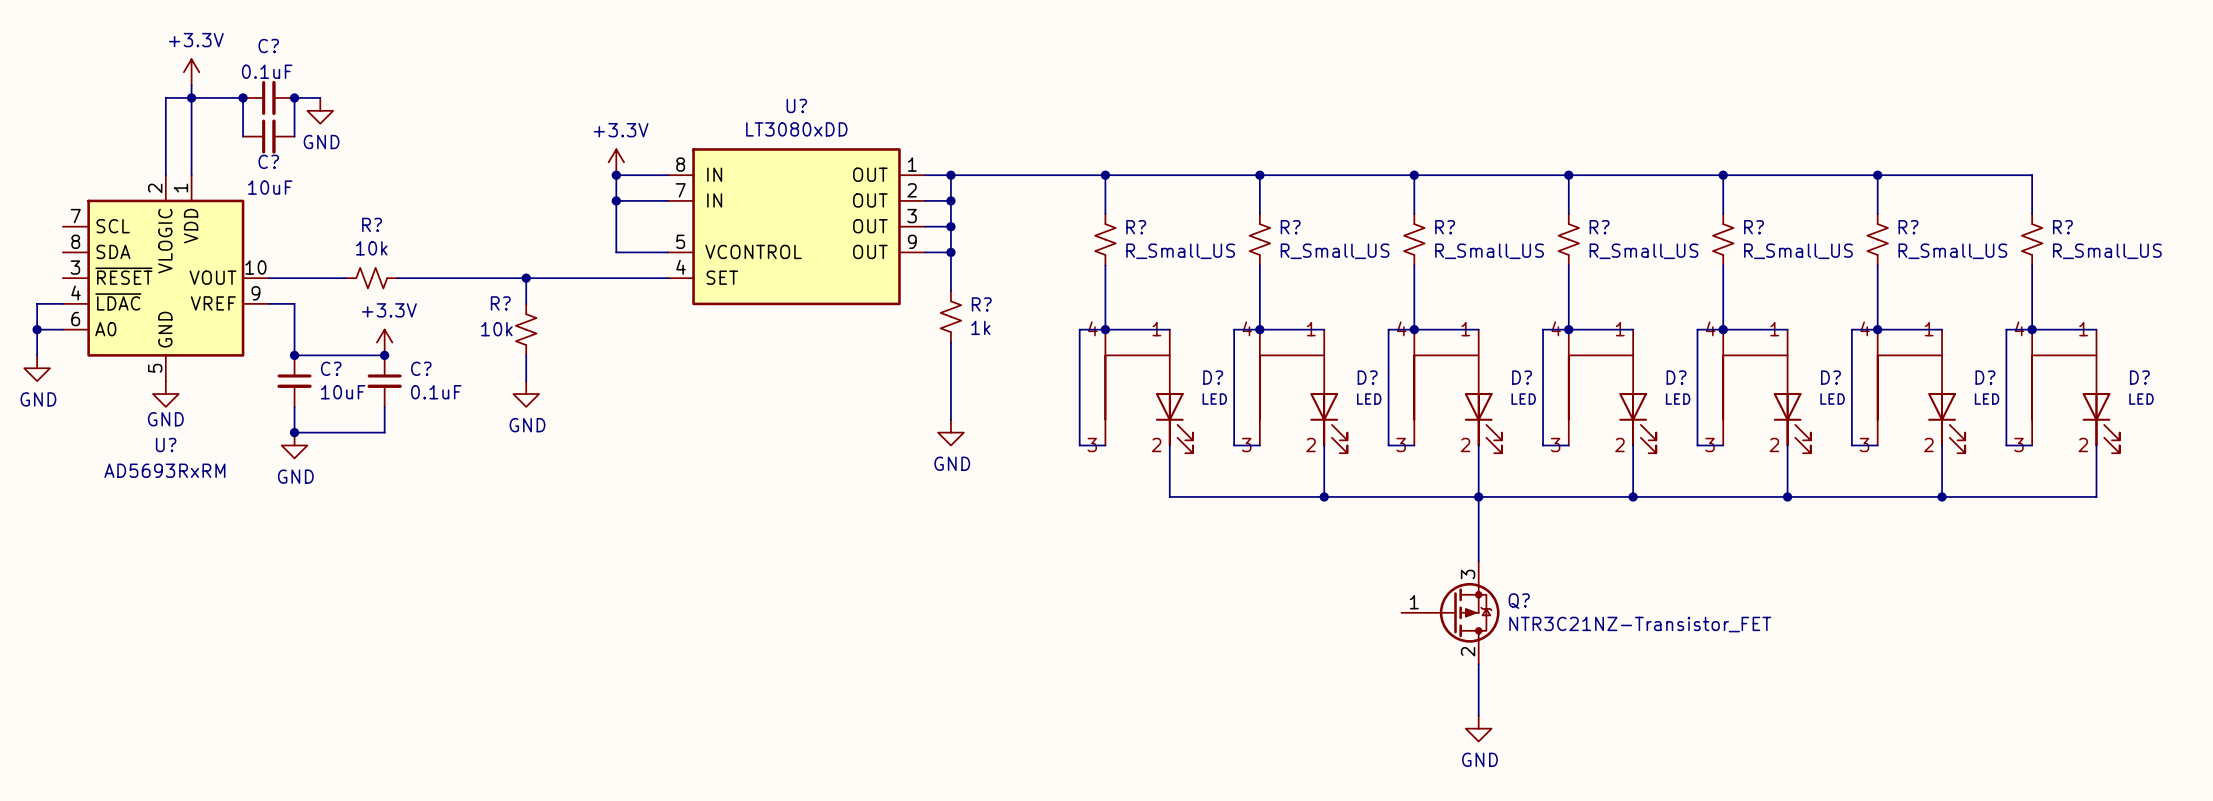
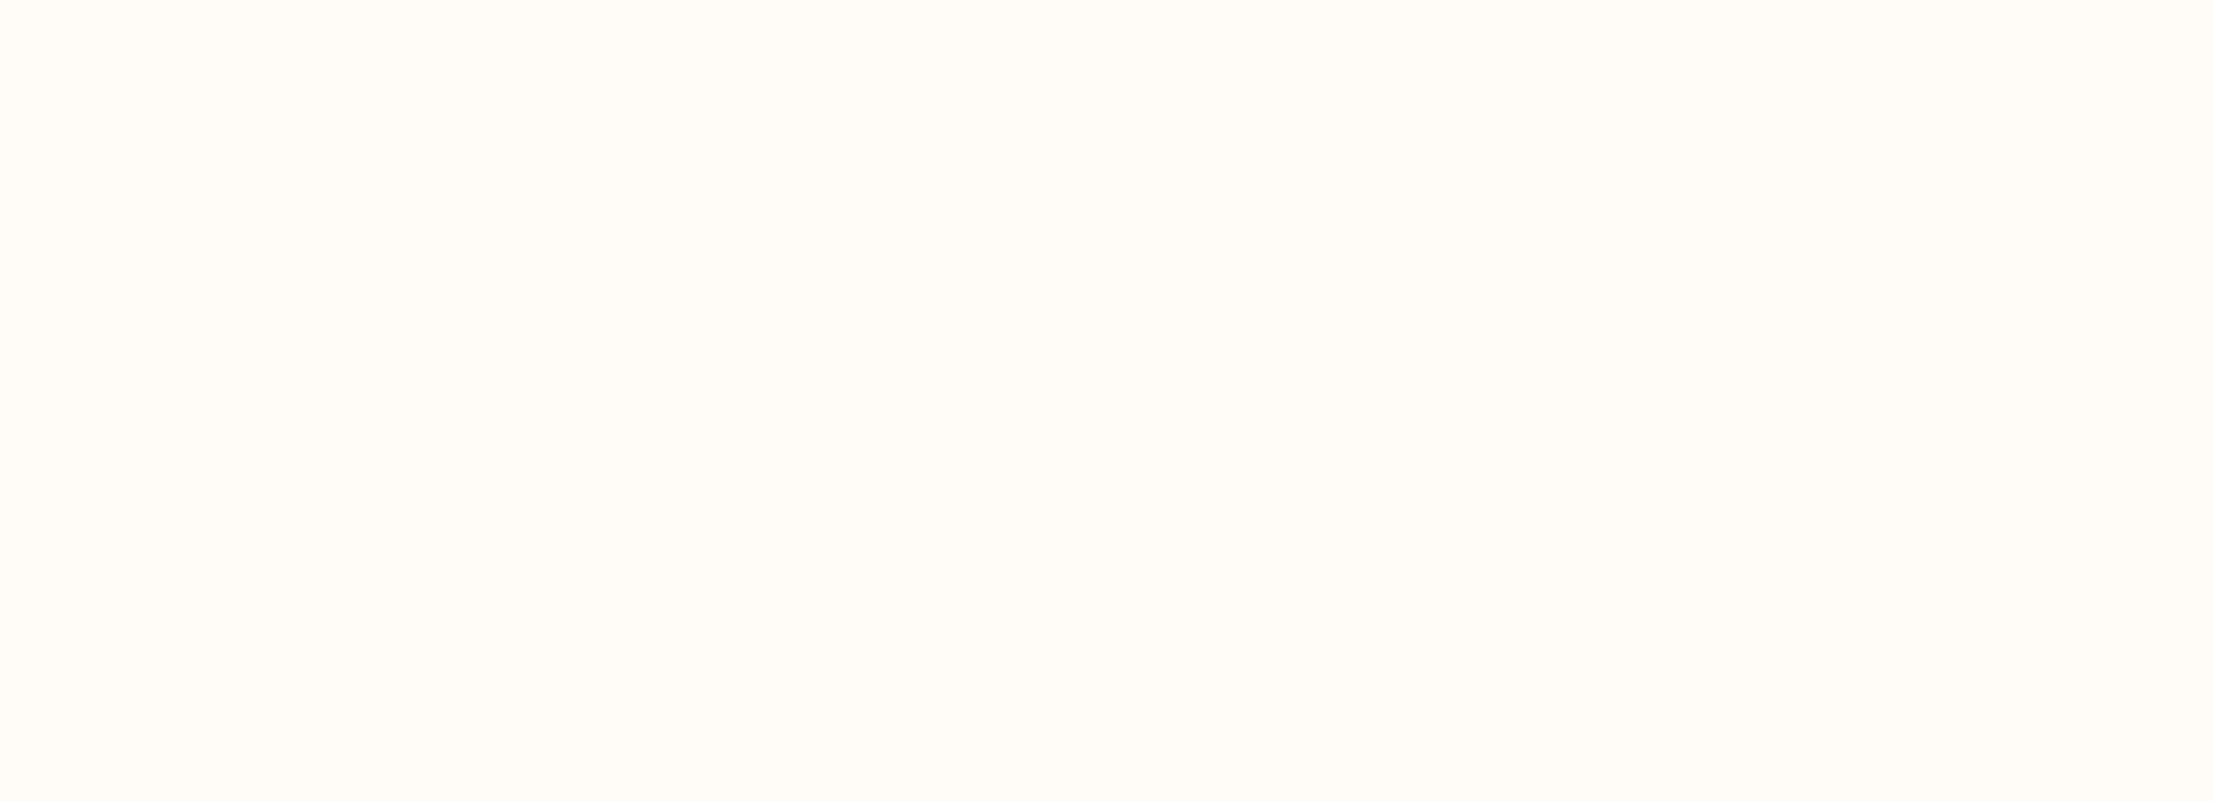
power symbol: +3.3V (191, 72) -> none
wire: (191, 85) (191, 175) -> none
junction: (191, 97) -> none
junction: (243, 97) -> none
C?: 0.1uF (268, 97) -> none
junction: (294, 97) -> none
wire: (320, 97) (294, 97) (294, 136) -> none
power symbol: GND (320, 110) -> none
wire: (243, 136) (243, 97) (165, 97) (165, 175) -> none
C?: 10uF (268, 136) -> none
power symbol: +3.3V (616, 162) -> none
junction: (616, 175) -> none
wire: (667, 175) (616, 175) (616, 252) (667, 252) -> none
wire: (925, 175) (2032, 175) (2032, 213) -> none
wire: (950, 175) (950, 291) -> none
junction: (950, 175) -> none
wire: (1105, 175) (1105, 213) -> none
junction: (1105, 175) -> none
wire: (1259, 175) (1259, 213) -> none
junction: (1259, 175) -> none
wire: (1414, 175) (1414, 213) -> none
junction: (1414, 175) -> none
wire: (1568, 175) (1568, 213) -> none
junction: (1568, 175) -> none
wire: (1723, 175) (1723, 213) -> none
junction: (1723, 175) -> none
wire: (1877, 175) (1877, 213) -> none
junction: (1877, 175) -> none
wire: (616, 200) (667, 200) -> none
junction: (616, 200) -> none
wire: (925, 200) (950, 200) -> none
junction: (950, 200) -> none
U?: LT3080xDD (796, 226) -> none
wire: (925, 226) (950, 226) -> none
junction: (950, 226) -> none
R?: R_Small_US (1105, 239) -> none
R?: R_Small_US (1259, 239) -> none
R?: R_Small_US (1414, 239) -> none
R?: R_Small_US (1568, 239) -> none
R?: R_Small_US (1723, 239) -> none
R?: R_Small_US (1877, 239) -> none
R?: R_Small_US (2032, 239) -> none
wire: (925, 252) (950, 252) -> none
junction: (950, 252) -> none
wire: (1105, 265) (1105, 329) -> none
wire: (1259, 265) (1259, 329) -> none
wire: (1414, 265) (1414, 329) -> none
wire: (1568, 265) (1568, 329) -> none
wire: (1723, 265) (1723, 329) -> none
wire: (1877, 265) (1877, 329) -> none
wire: (2032, 265) (2032, 329) -> none
U?: AD5693RxRM (165, 278) -> none
wire: (268, 278) (346, 278) -> none
R?: 10k (371, 278) -> none
wire: (397, 278) (667, 278) -> none
wire: (526, 278) (526, 303) -> none
junction: (526, 278) -> none
wire: (62, 303) (37, 303) (37, 355) -> none
wire: (268, 303) (294, 303) (294, 355) (384, 355) -> none
R?: 1k (950, 316) -> none
wire: (37, 329) (62, 329) -> none
junction: (37, 329) -> none
R?: 10k (526, 329) -> none
junction: (1105, 329) -> none
wire: (1169, 329) (1079, 329) (1079, 445) (1105, 445) -> none
junction: (1259, 329) -> none
wire: (1324, 329) (1234, 329) (1234, 445) (1259, 445) -> none
junction: (1414, 329) -> none
wire: (1478, 329) (1388, 329) (1388, 445) (1414, 445) -> none
junction: (1568, 329) -> none
wire: (1633, 329) (1543, 329) (1543, 445) (1568, 445) -> none
junction: (1723, 329) -> none
wire: (1787, 329) (1697, 329) (1697, 445) (1723, 445) -> none
junction: (1877, 329) -> none
wire: (1942, 329) (1851, 329) (1851, 445) (1877, 445) -> none
junction: (2032, 329) -> none
wire: (2096, 329) (2006, 329) (2006, 445) (2032, 445) -> none
power symbol: +3.3V (384, 342) -> none
wire: (950, 342) (950, 419) -> none
junction: (294, 355) -> none
junction: (384, 355) -> none
wire: (526, 355) (526, 381) -> none
power symbol: GND (37, 368) -> none
C?: 10uF (294, 381) -> none
C?: 0.1uF (384, 381) -> none
D?: LED (1149, 391) -> none
D?: LED (1303, 391) -> none
D?: LED (1458, 391) -> none
D?: LED (1612, 391) -> none
D?: LED (1766, 391) -> none
D?: LED (1921, 391) -> none
D?: LED (2075, 391) -> none
power symbol: GND (165, 394) -> none
power symbol: GND (526, 394) -> none
wire: (294, 406) (294, 432) (384, 432) (384, 406) -> none
junction: (294, 432) -> none
power symbol: GND (950, 432) -> none
power symbol: GND (294, 445) -> none
wire: (1169, 445) (1169, 496) (2096, 496) (2096, 445) -> none
wire: (1324, 445) (1324, 496) -> none
wire: (1478, 445) (1478, 561) -> none
wire: (1633, 445) (1633, 496) -> none
wire: (1787, 445) (1787, 496) -> none
wire: (1942, 445) (1942, 496) -> none
junction: (1324, 496) -> none
junction: (1478, 496) -> none
junction: (1633, 496) -> none
junction: (1787, 496) -> none
junction: (1942, 496) -> none
Q?: NTR3C21NZ-Transistor_FET (1450, 612) -> none
wire: (1478, 664) (1478, 715) -> none
power symbol: GND (1478, 728) -> none

